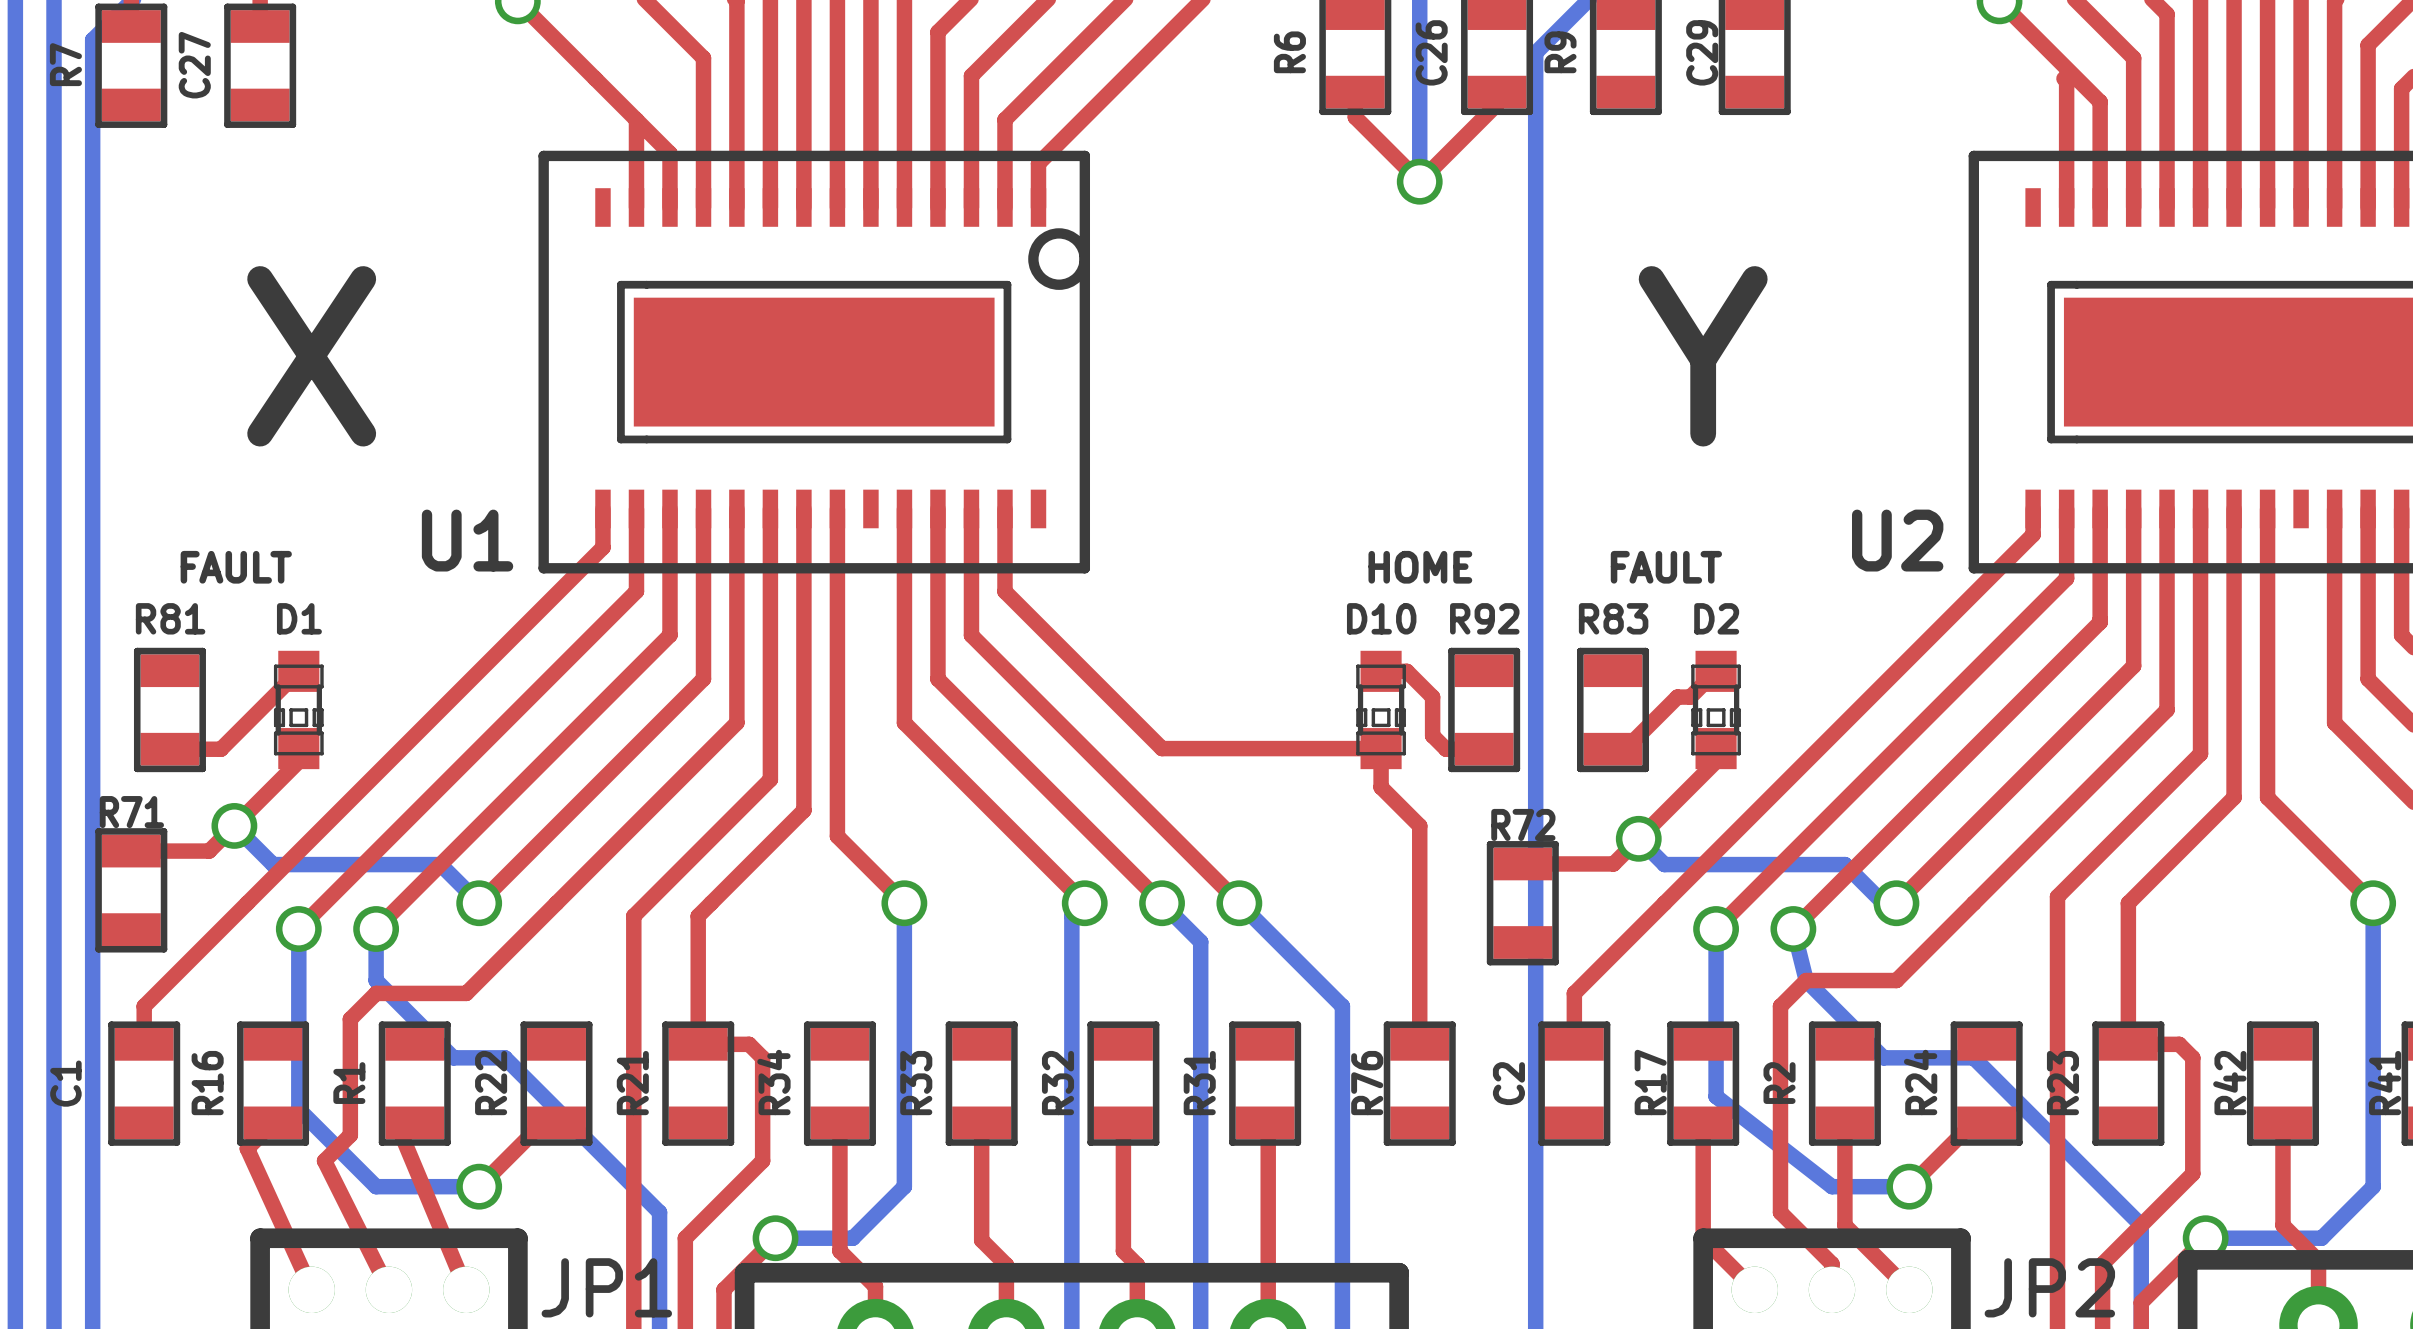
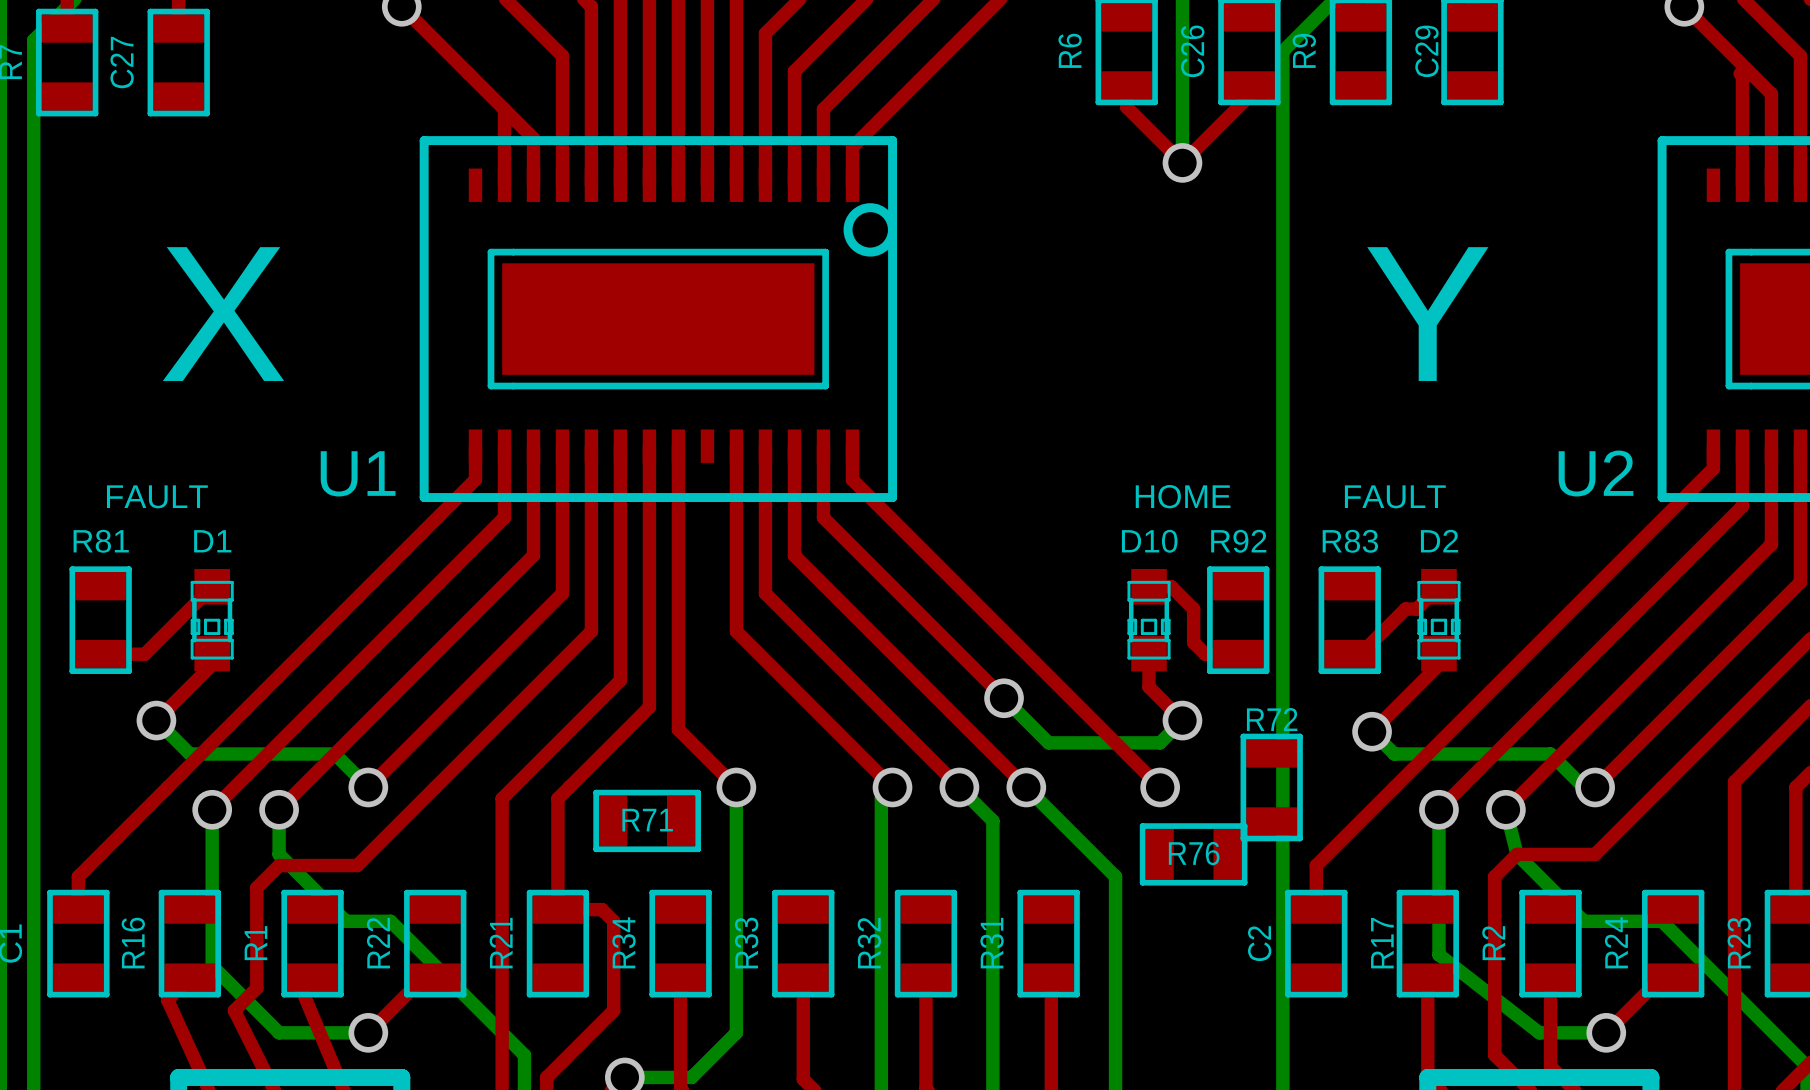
top track: none -> (852, 446) (852, 479) (1160, 787)
top track: (1162, 748) (1381, 748) -> (959, 653) (1004, 698)
bottom track: none -> (1004, 698) (1048, 742) (1160, 742) (1182, 720)
via: none -> (1004, 698)
top track: (234, 825) (209, 851) (131, 851) -> none
top track: (1419, 825) (1419, 1044) -> none
via: none -> (1182, 720)
top track: (1638, 838) (1613, 863) (1522, 863) -> none
R71 rotation: 0° (131, 890) -> 90° clockwise (647, 820)
R71 position: (131, 890) -> (647, 820)
via: none -> (1160, 787)
R76 rotation: 0° (1419, 1083) -> 90° clockwise (1193, 854)
R76 position: (1419, 1083) -> (1193, 854)

